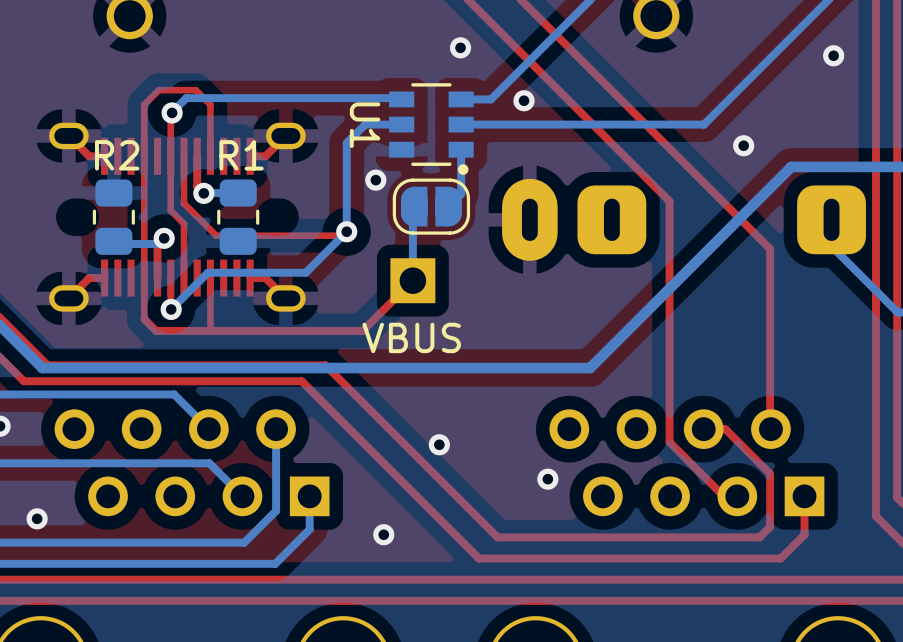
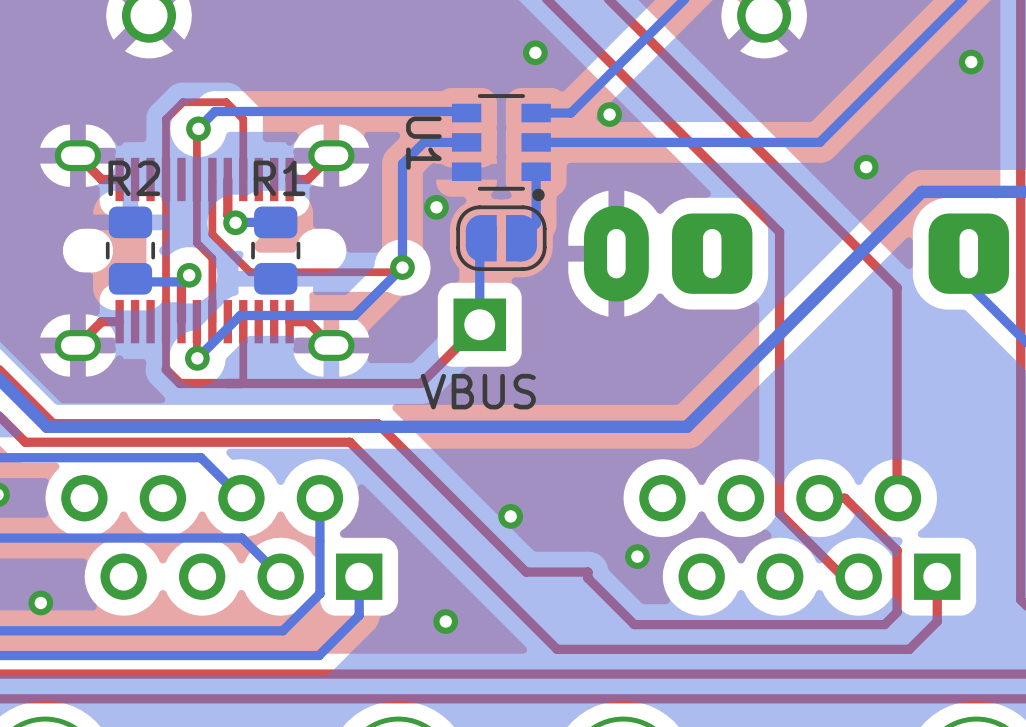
top track: (452, 492) (497, 537) (545, 537) -> (526, 572) (587, 572) (587, 578) (634, 624)

